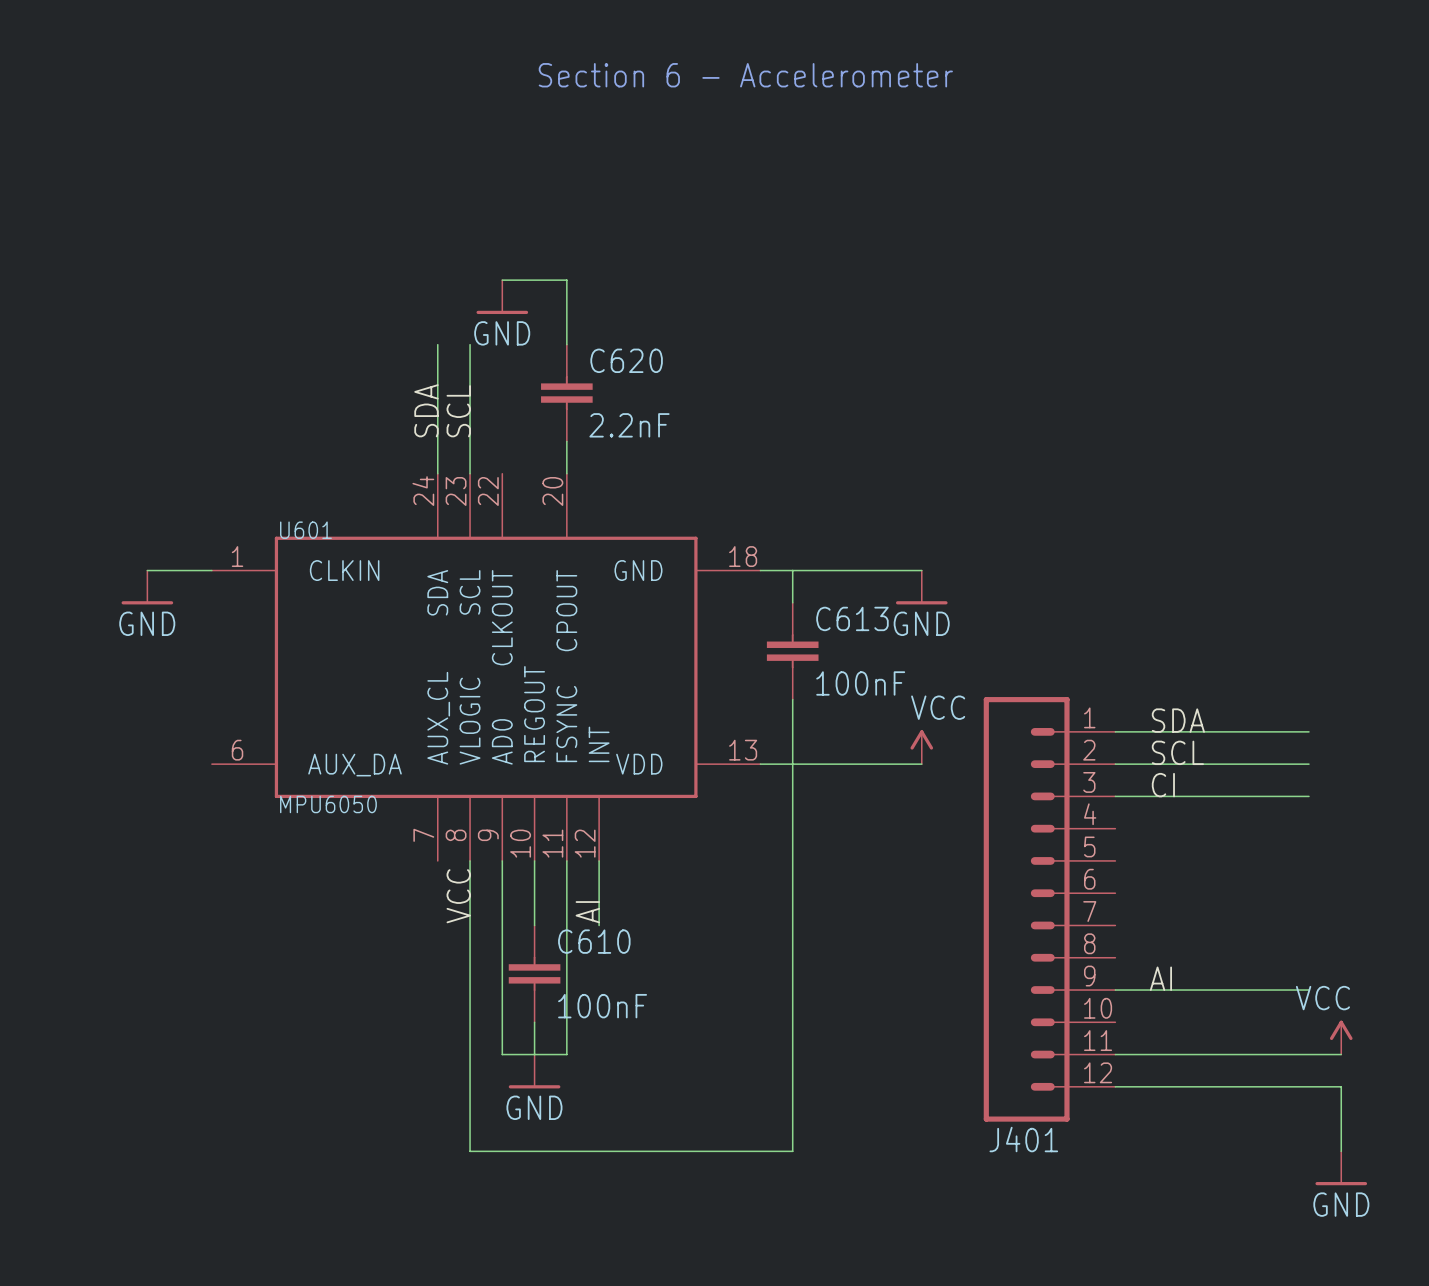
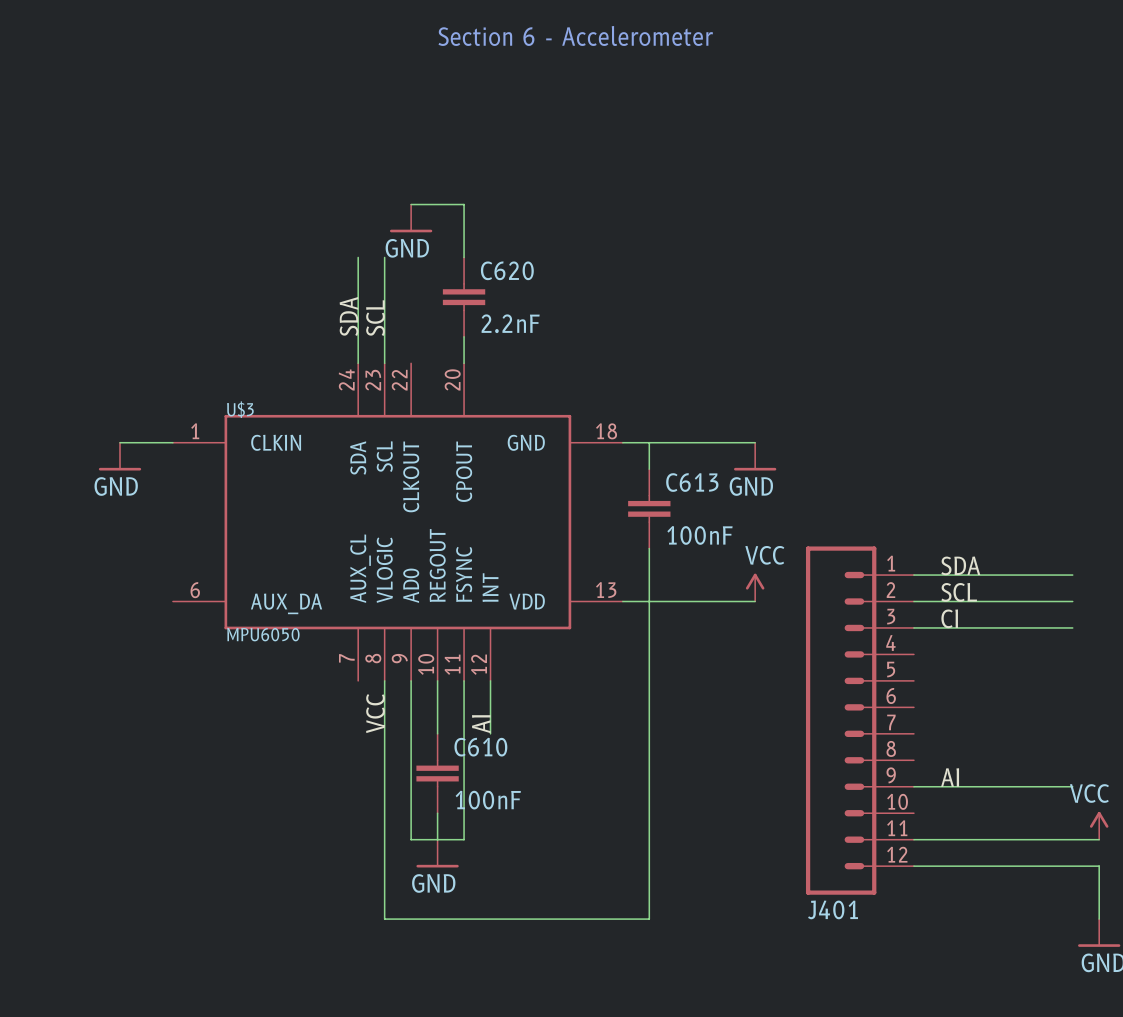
U601 name: U601 (305, 530) -> U$3 (240, 409)

